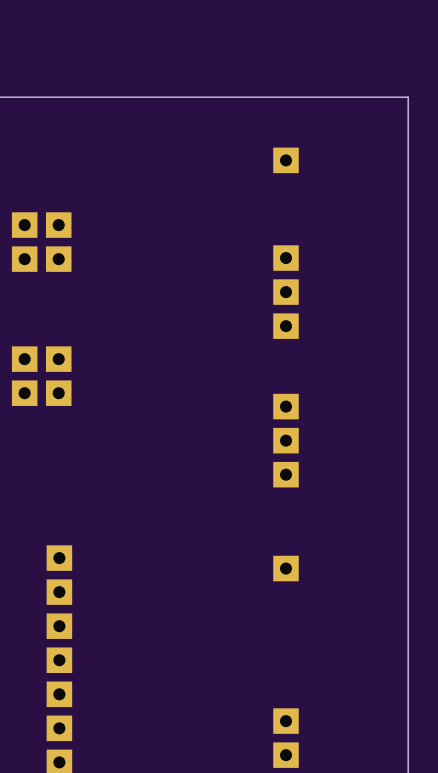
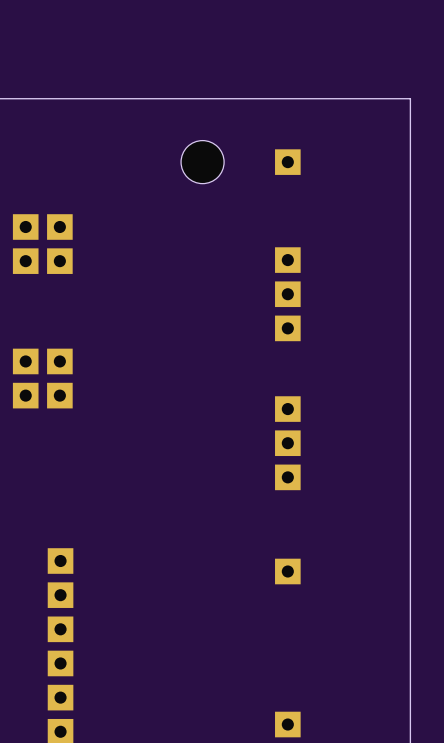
part: none -> (202, 162)

